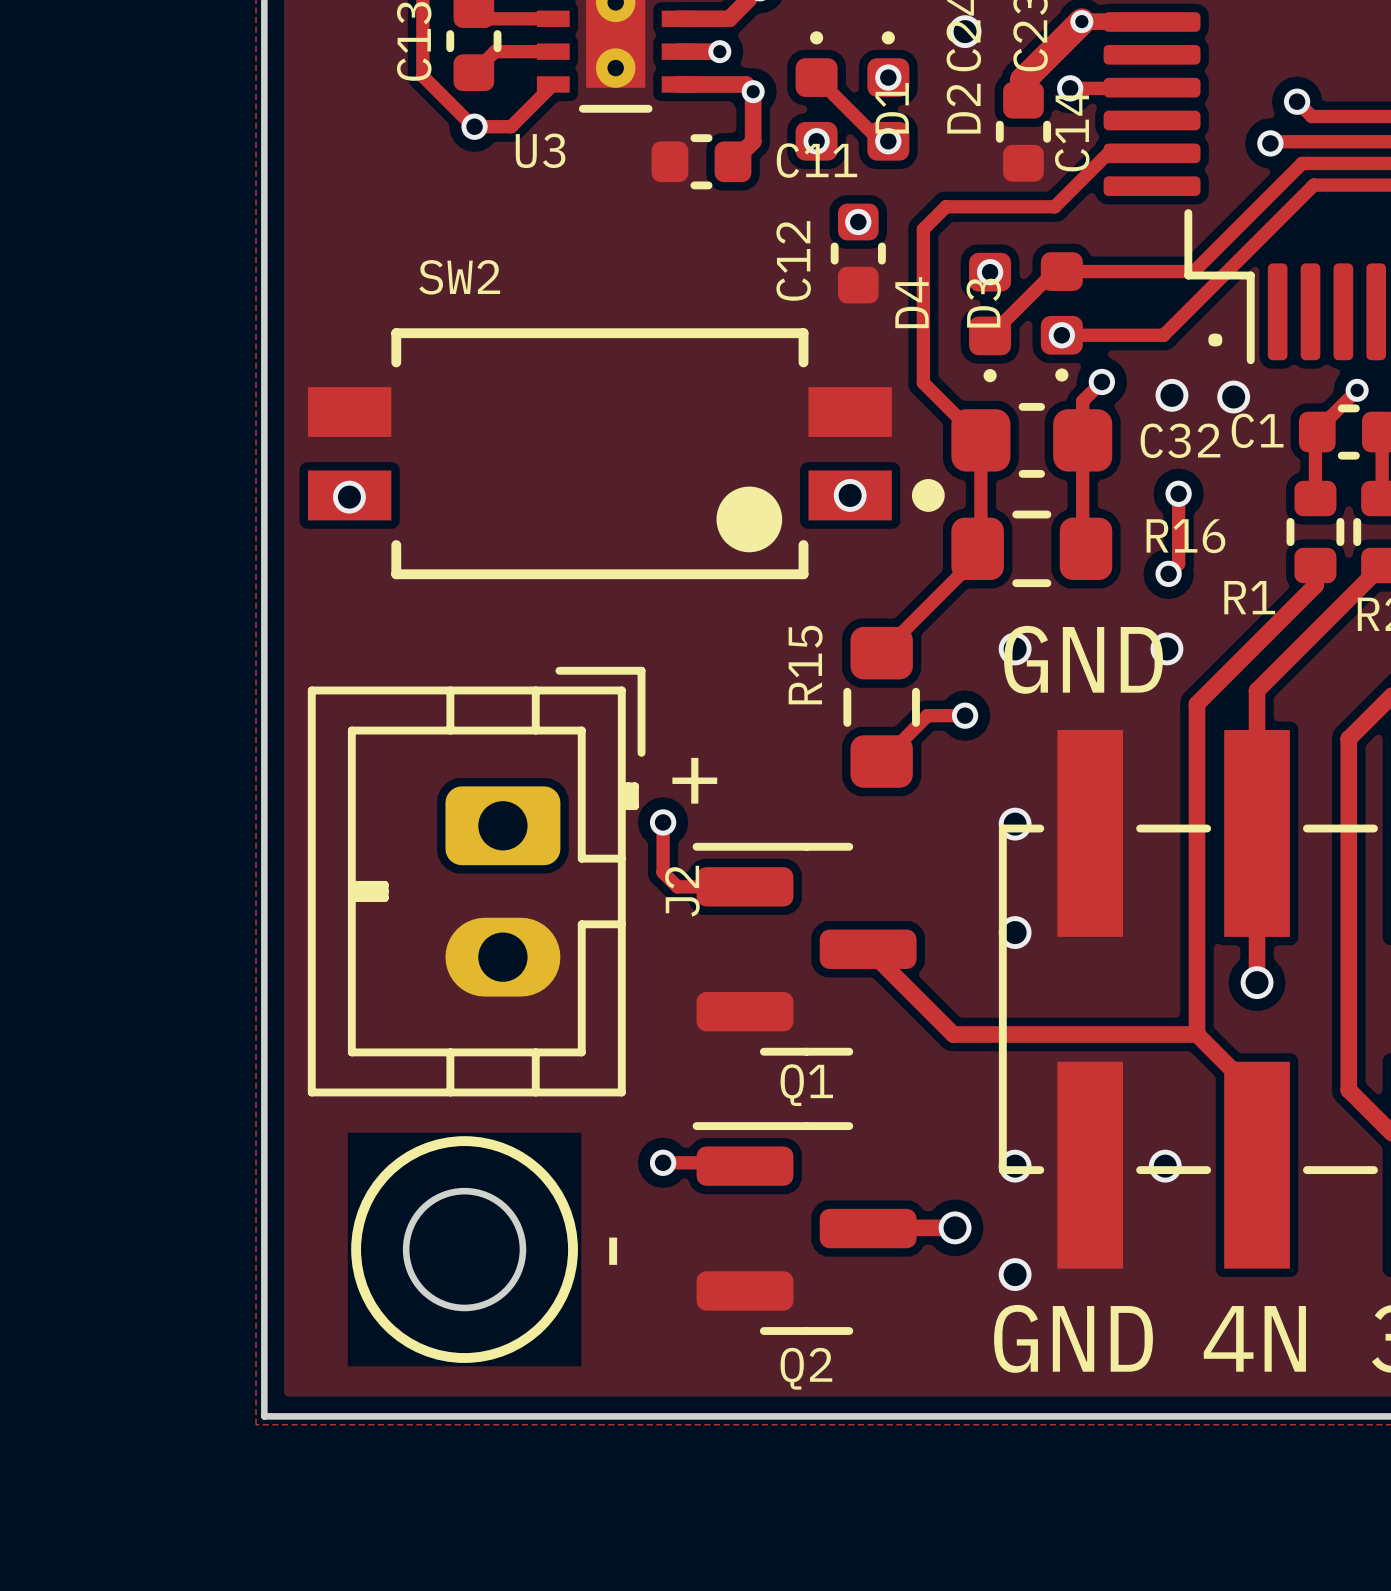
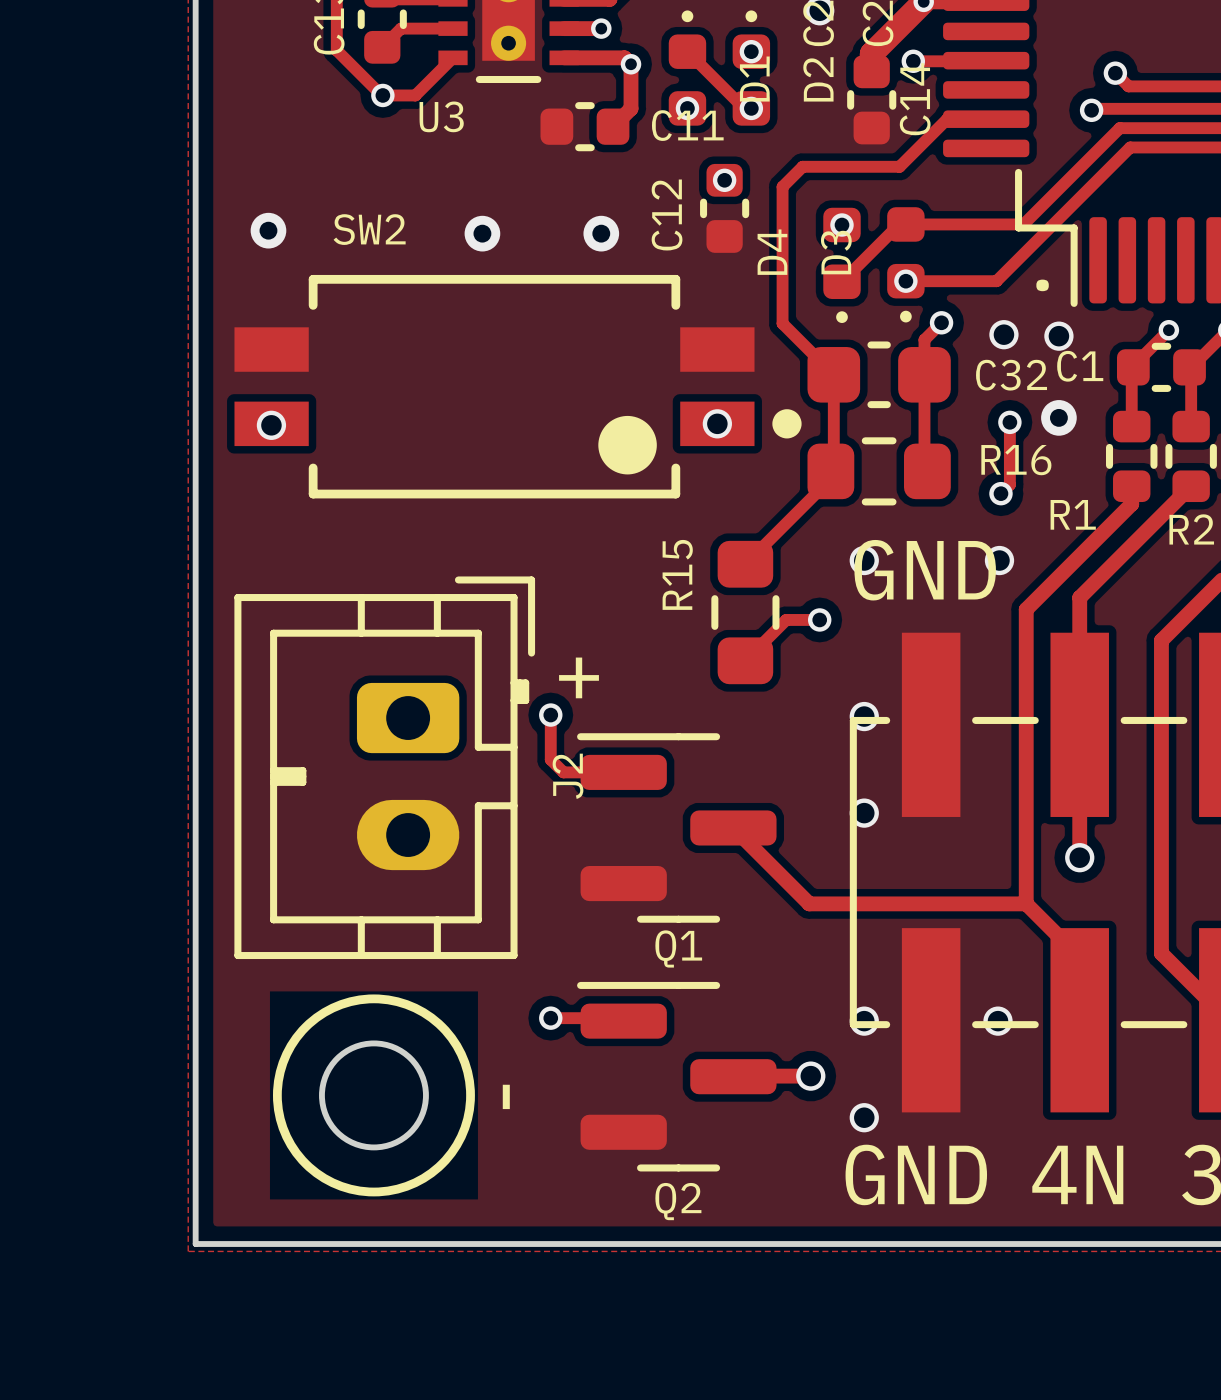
via: none -> (268, 230)
via: none -> (482, 233)
via: none -> (601, 233)
via: none -> (1058, 417)

